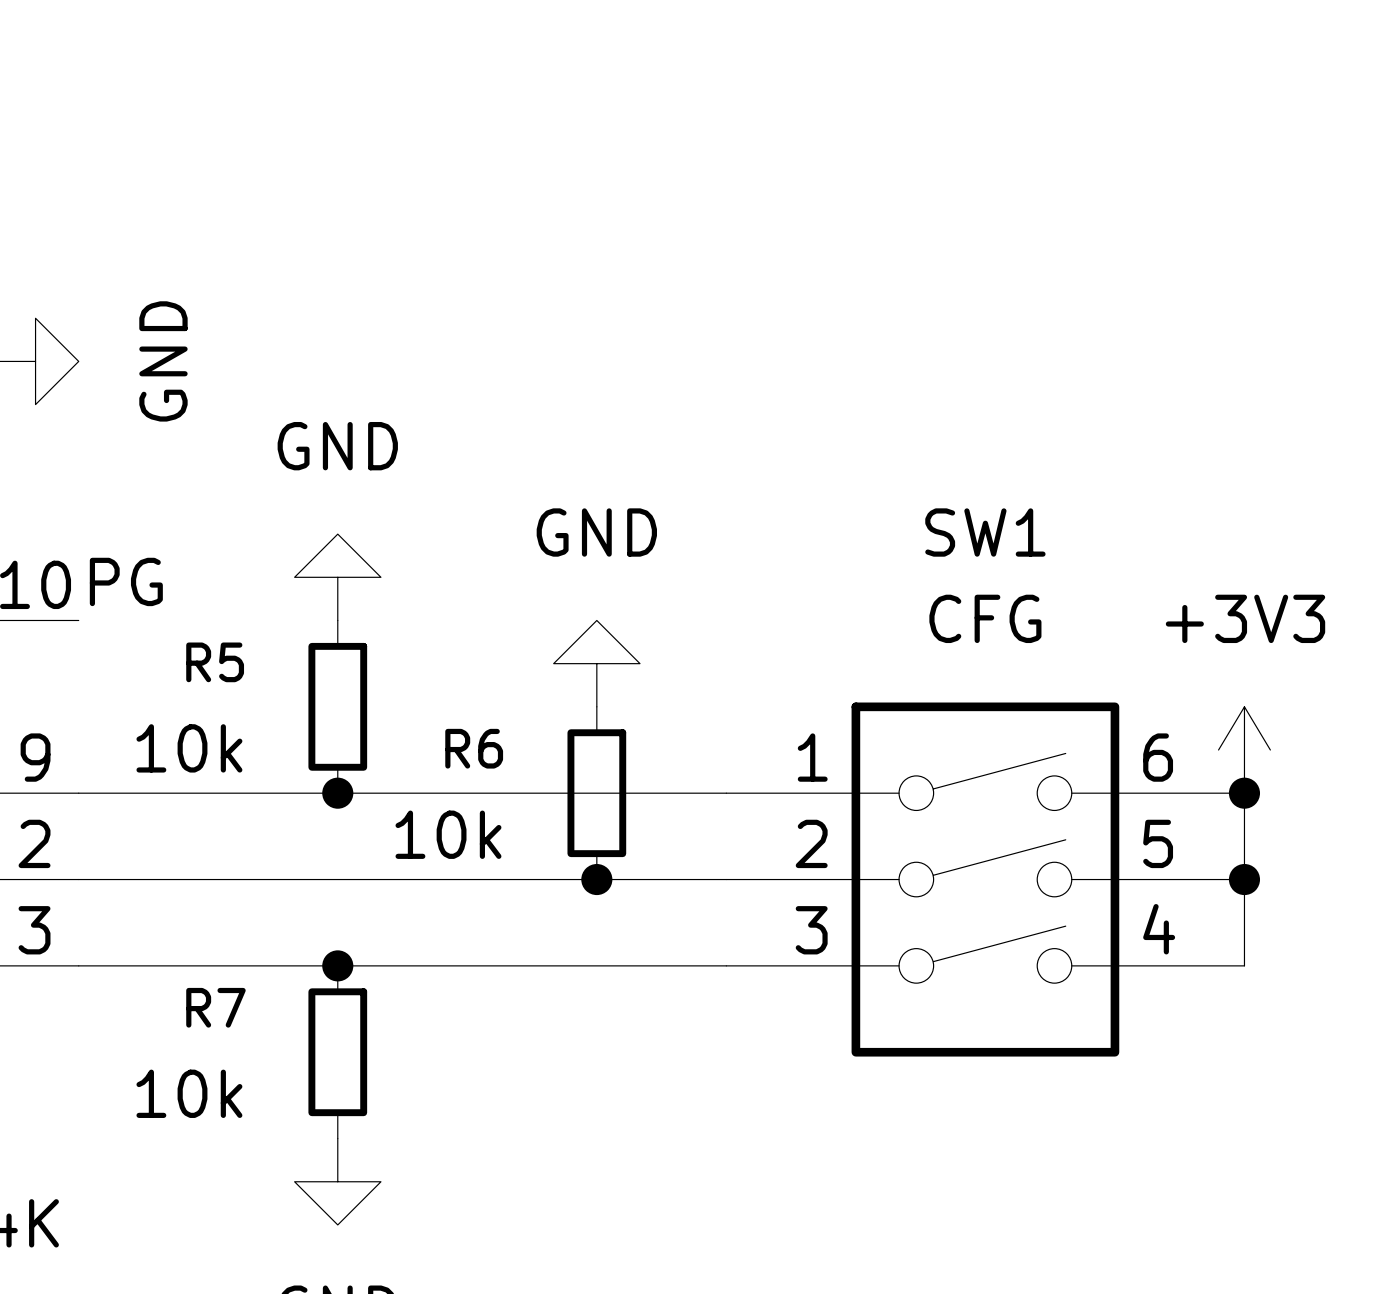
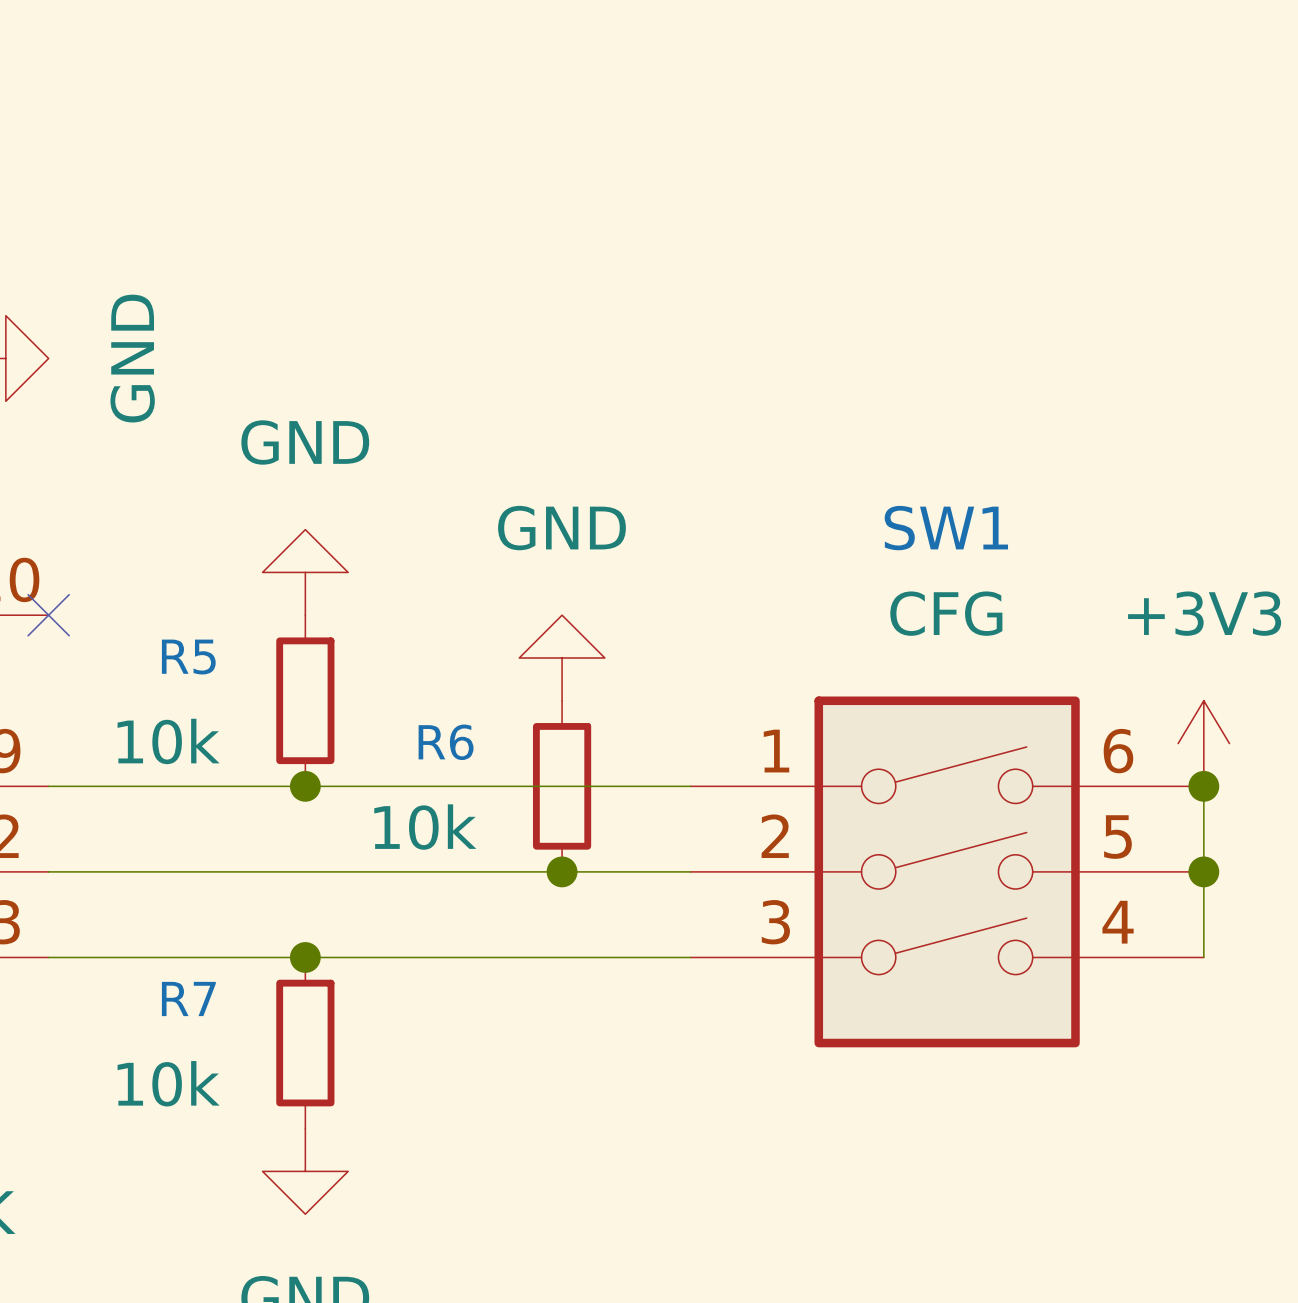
label: PG (126, 581) -> none
no-connect mark: none -> (48, 615)

